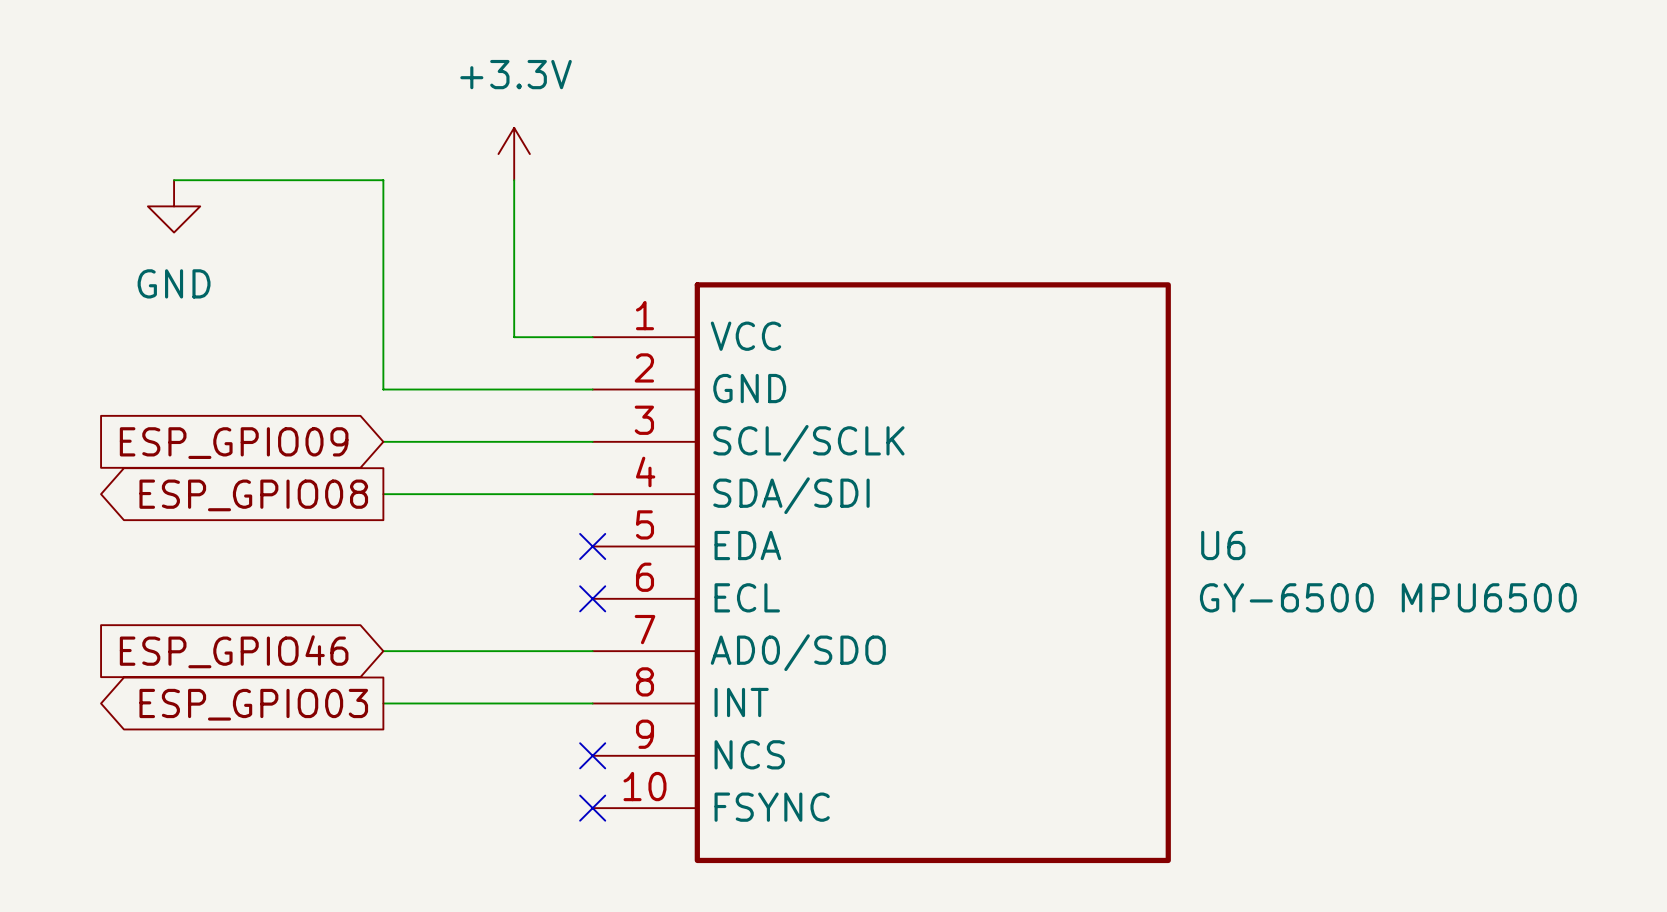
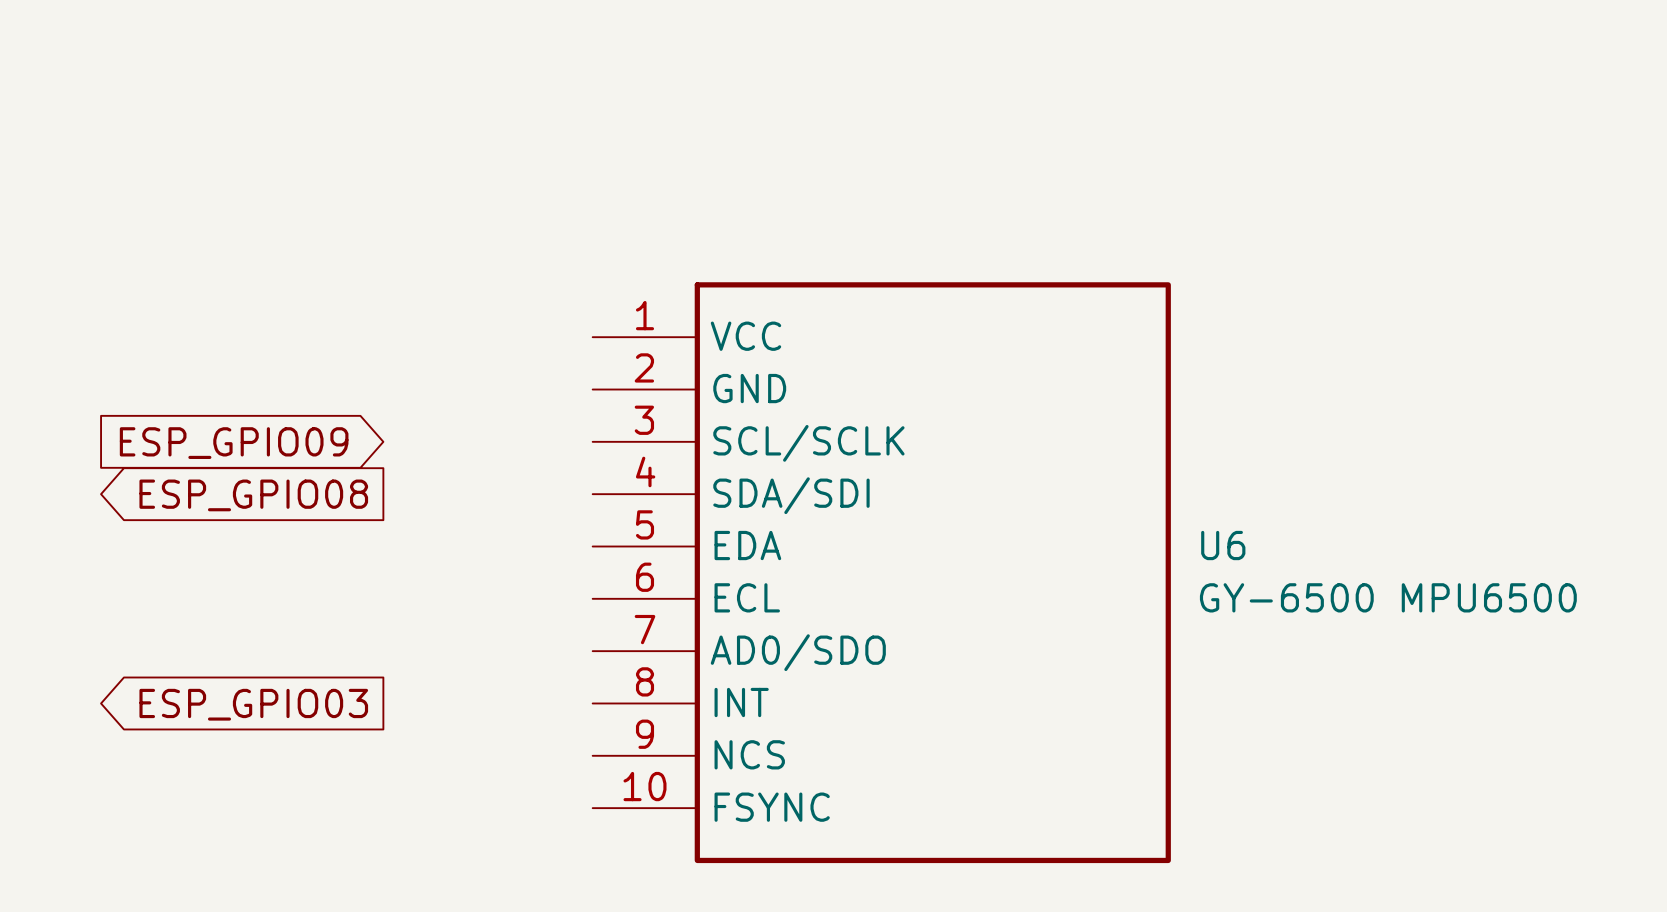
power symbol: +3.3V (514, 154) -> none
wire: (174, 180) (383, 180) (383, 389) (592, 389) -> none
wire: (514, 180) (514, 337) (592, 337) -> none
power symbol: GND (174, 206) -> none
wire: (383, 441) (592, 441) -> none
wire: (383, 494) (592, 494) -> none
no-connect mark: (592, 546) -> none
no-connect mark: (592, 598) -> none
global label: ESP_GPIO46 (234, 651) -> none
wire: (383, 651) (592, 651) -> none
wire: (383, 703) (592, 703) -> none
no-connect mark: (592, 755) -> none
no-connect mark: (592, 808) -> none

